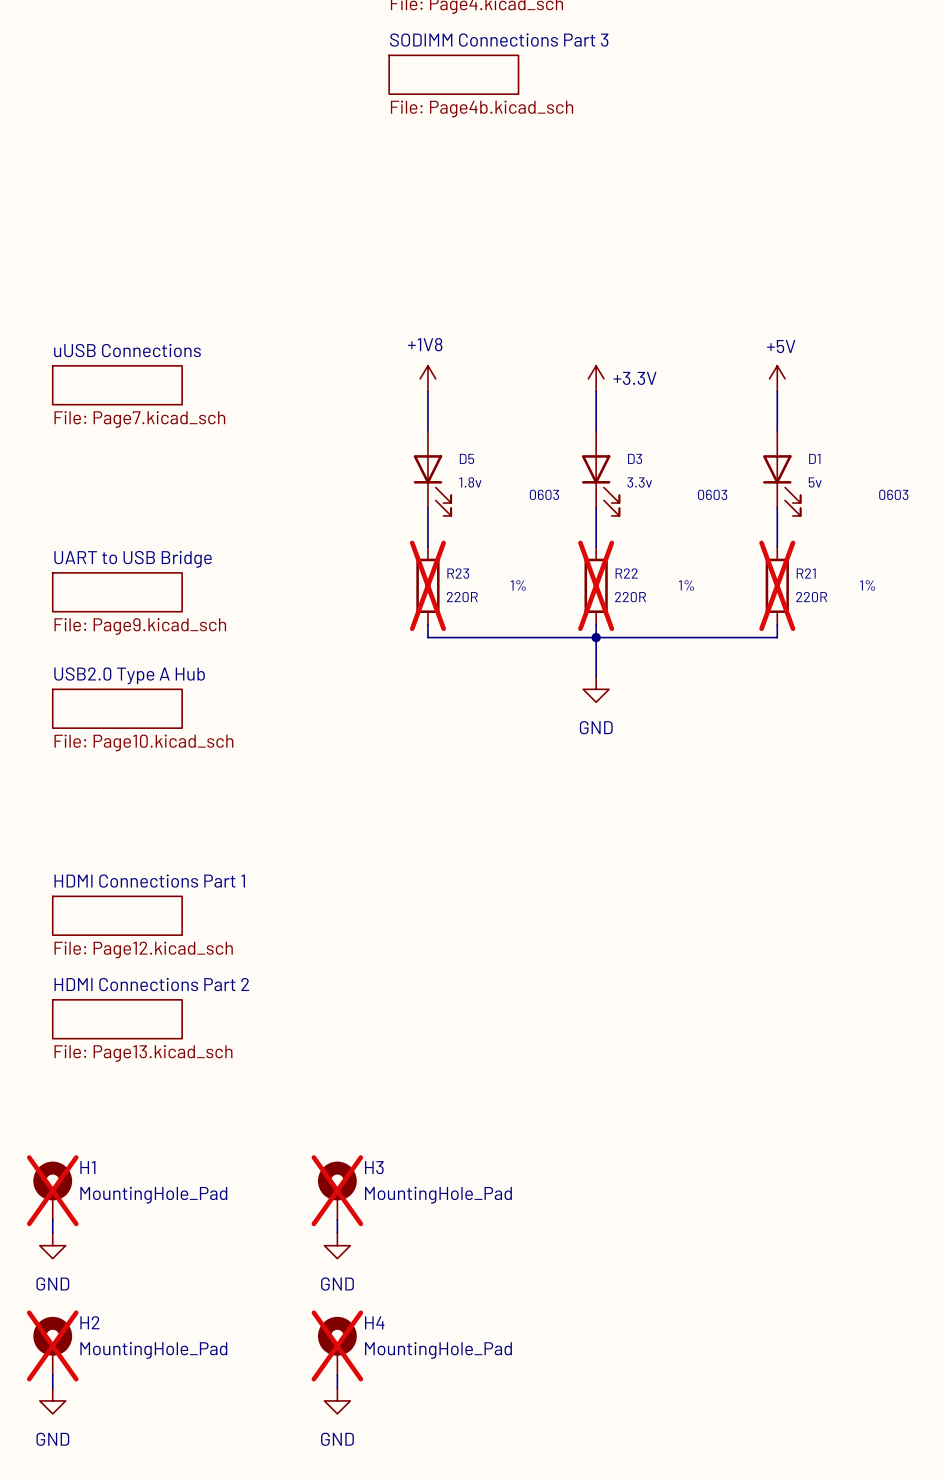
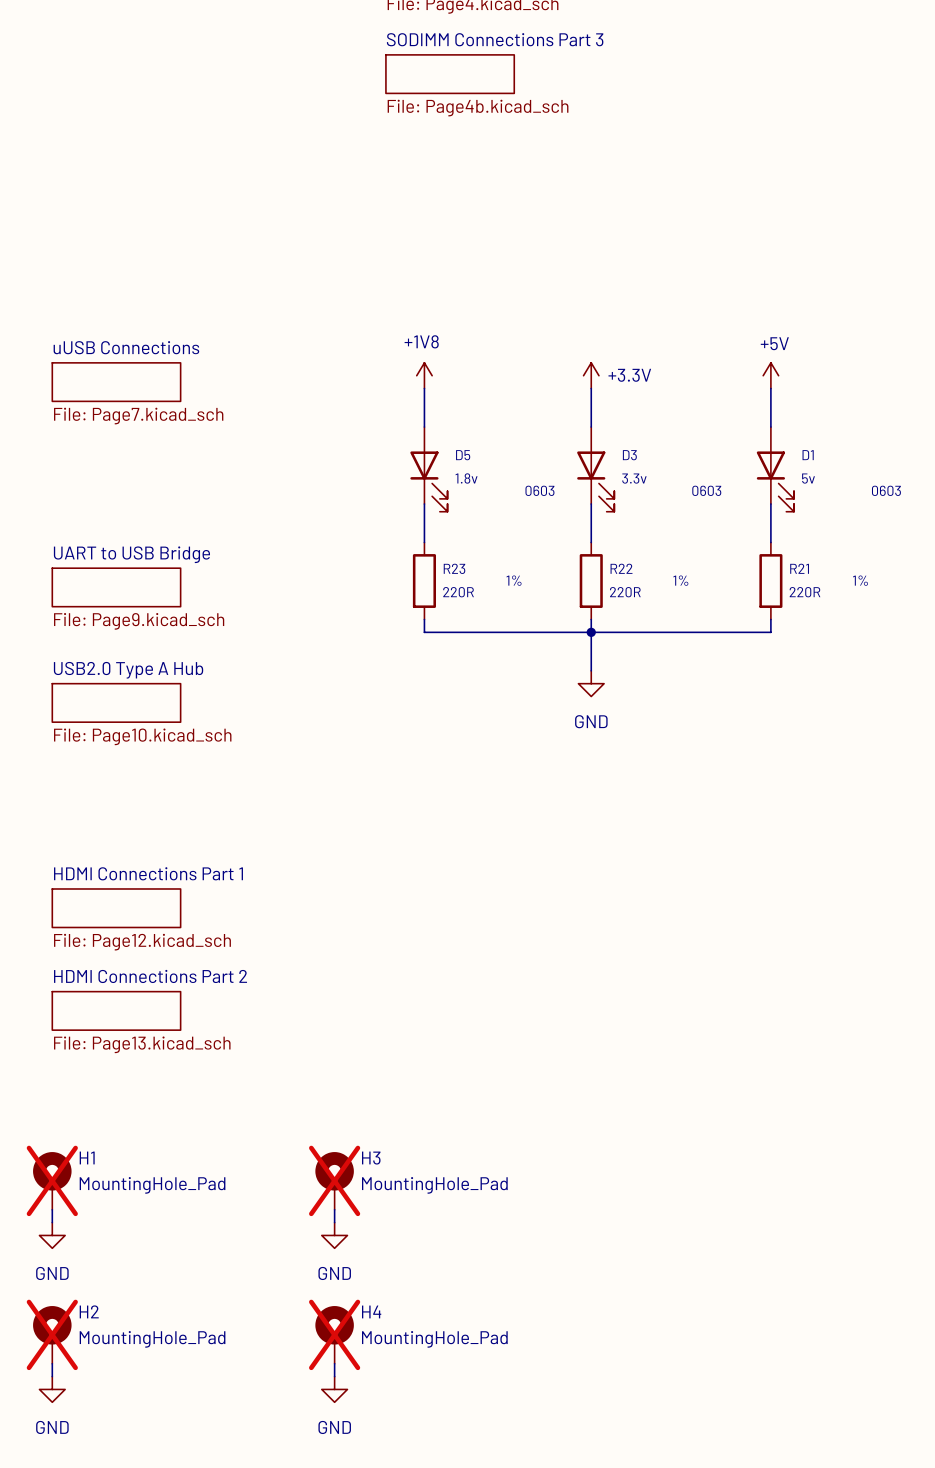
R23 do-not-place cross: (427, 585) -> none
R22 do-not-place cross: (596, 585) -> none
R21 do-not-place cross: (777, 585) -> none

